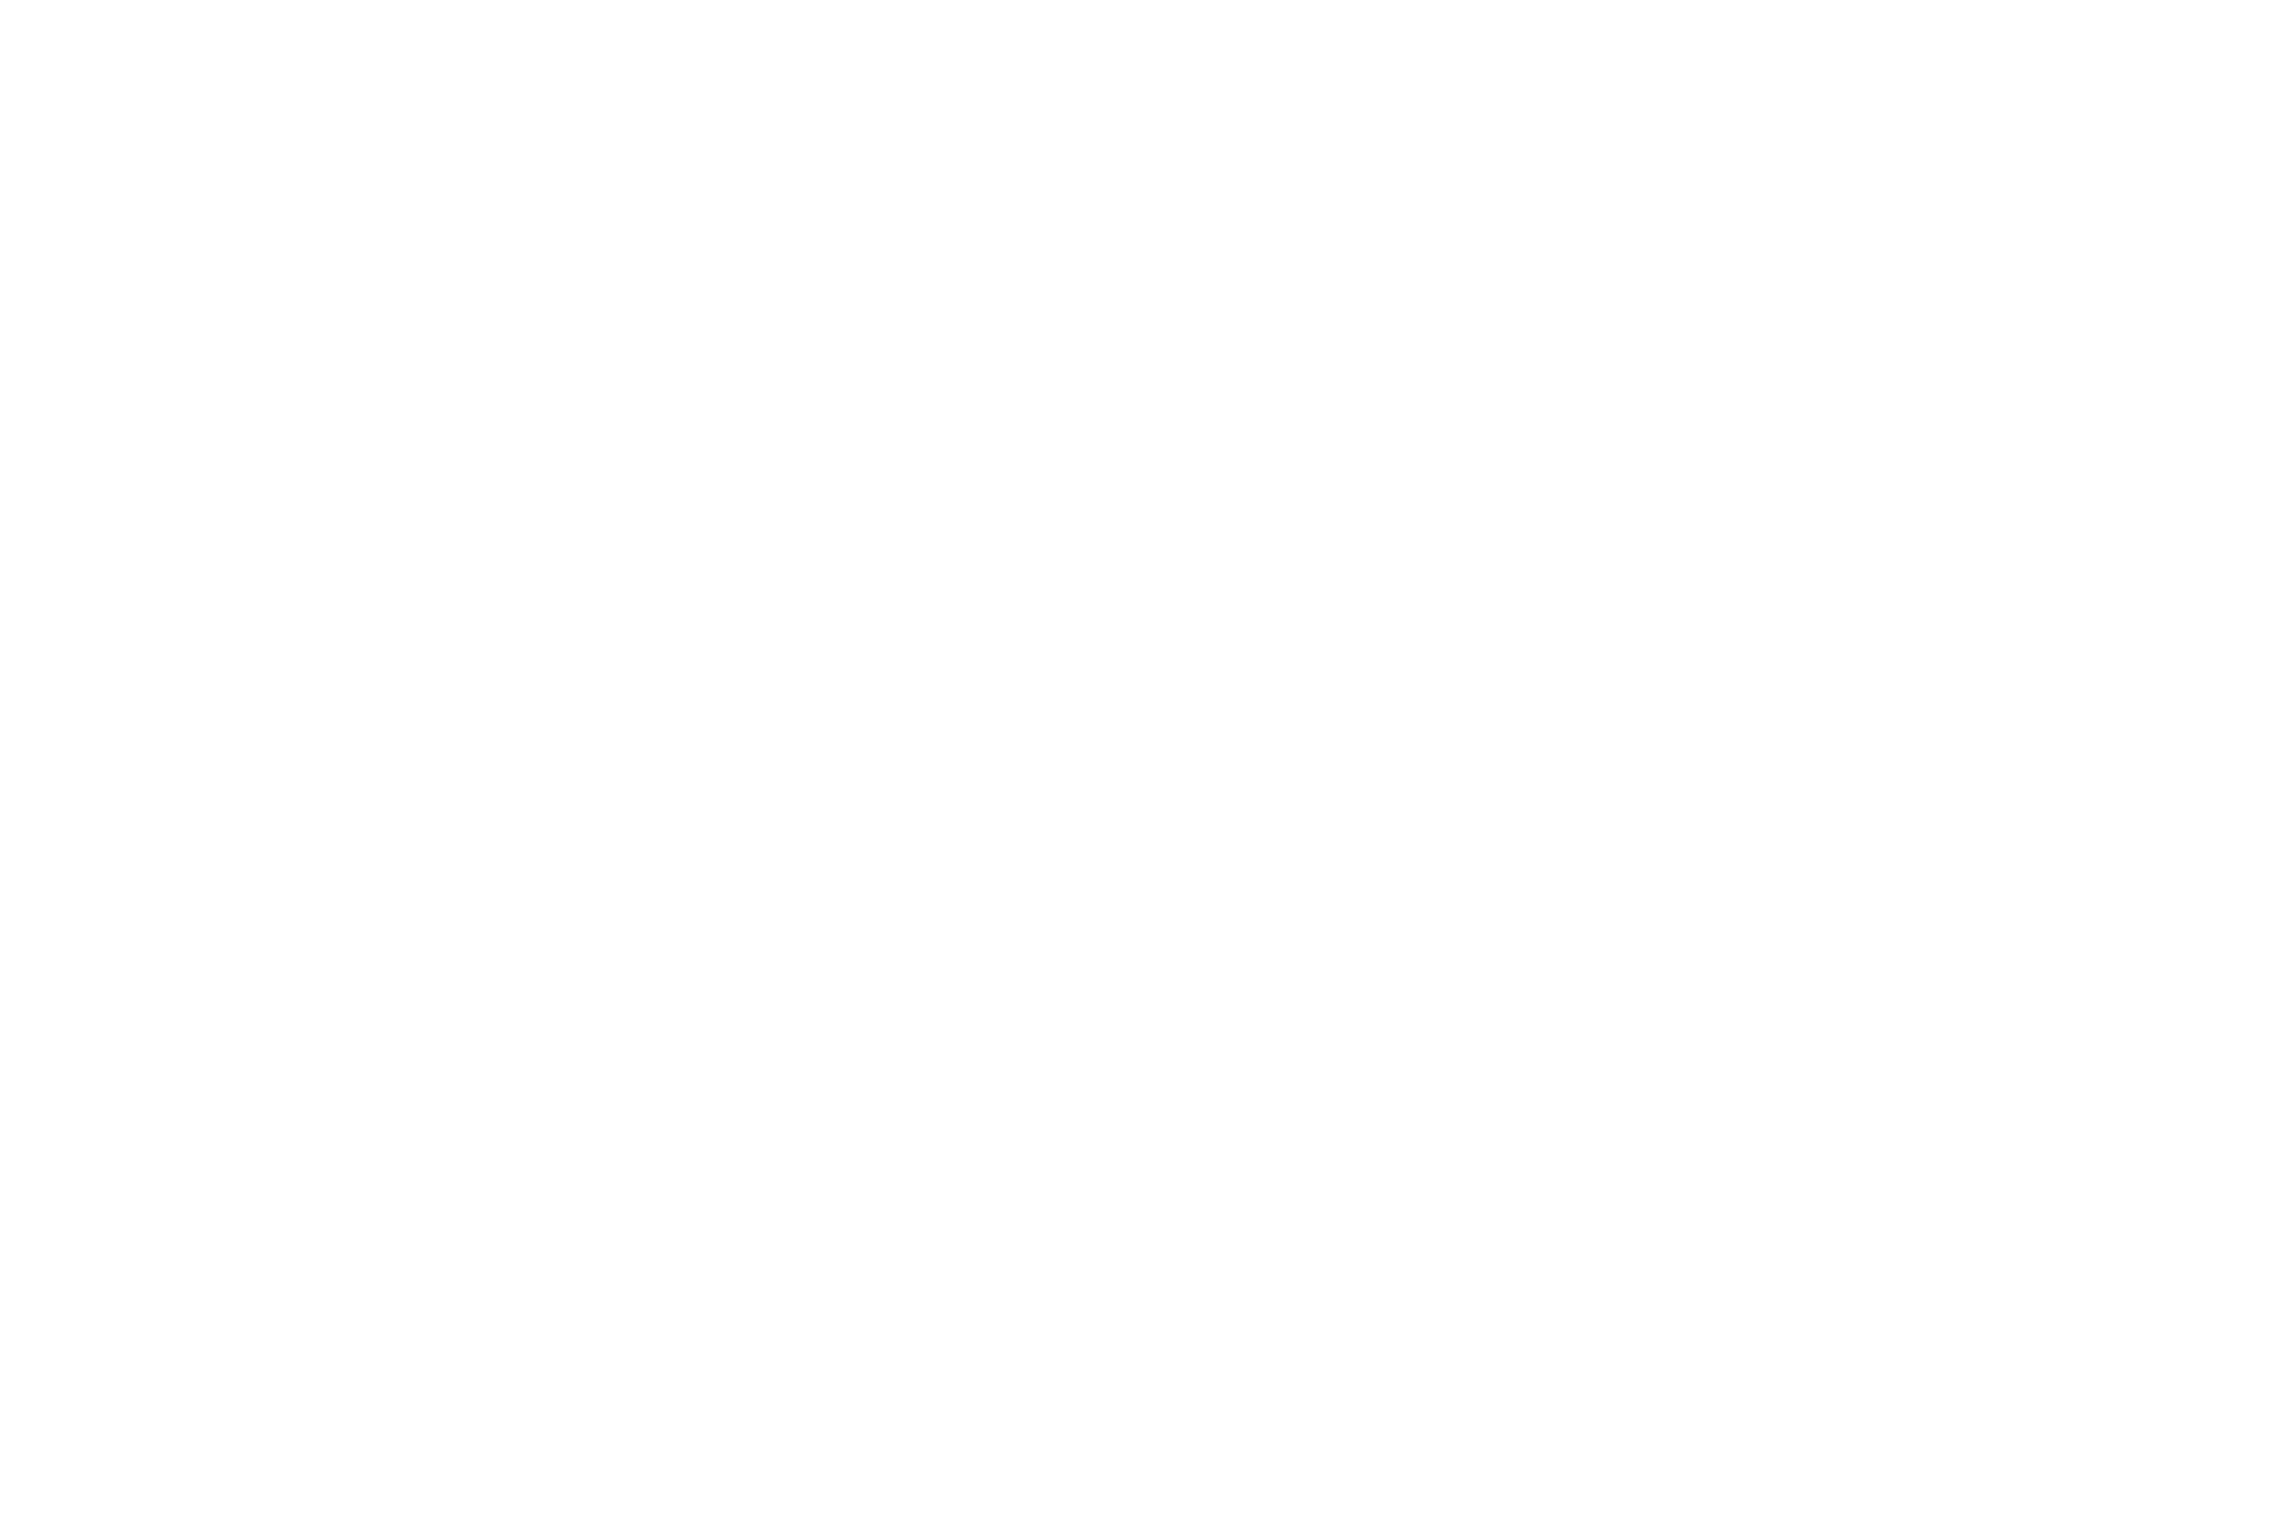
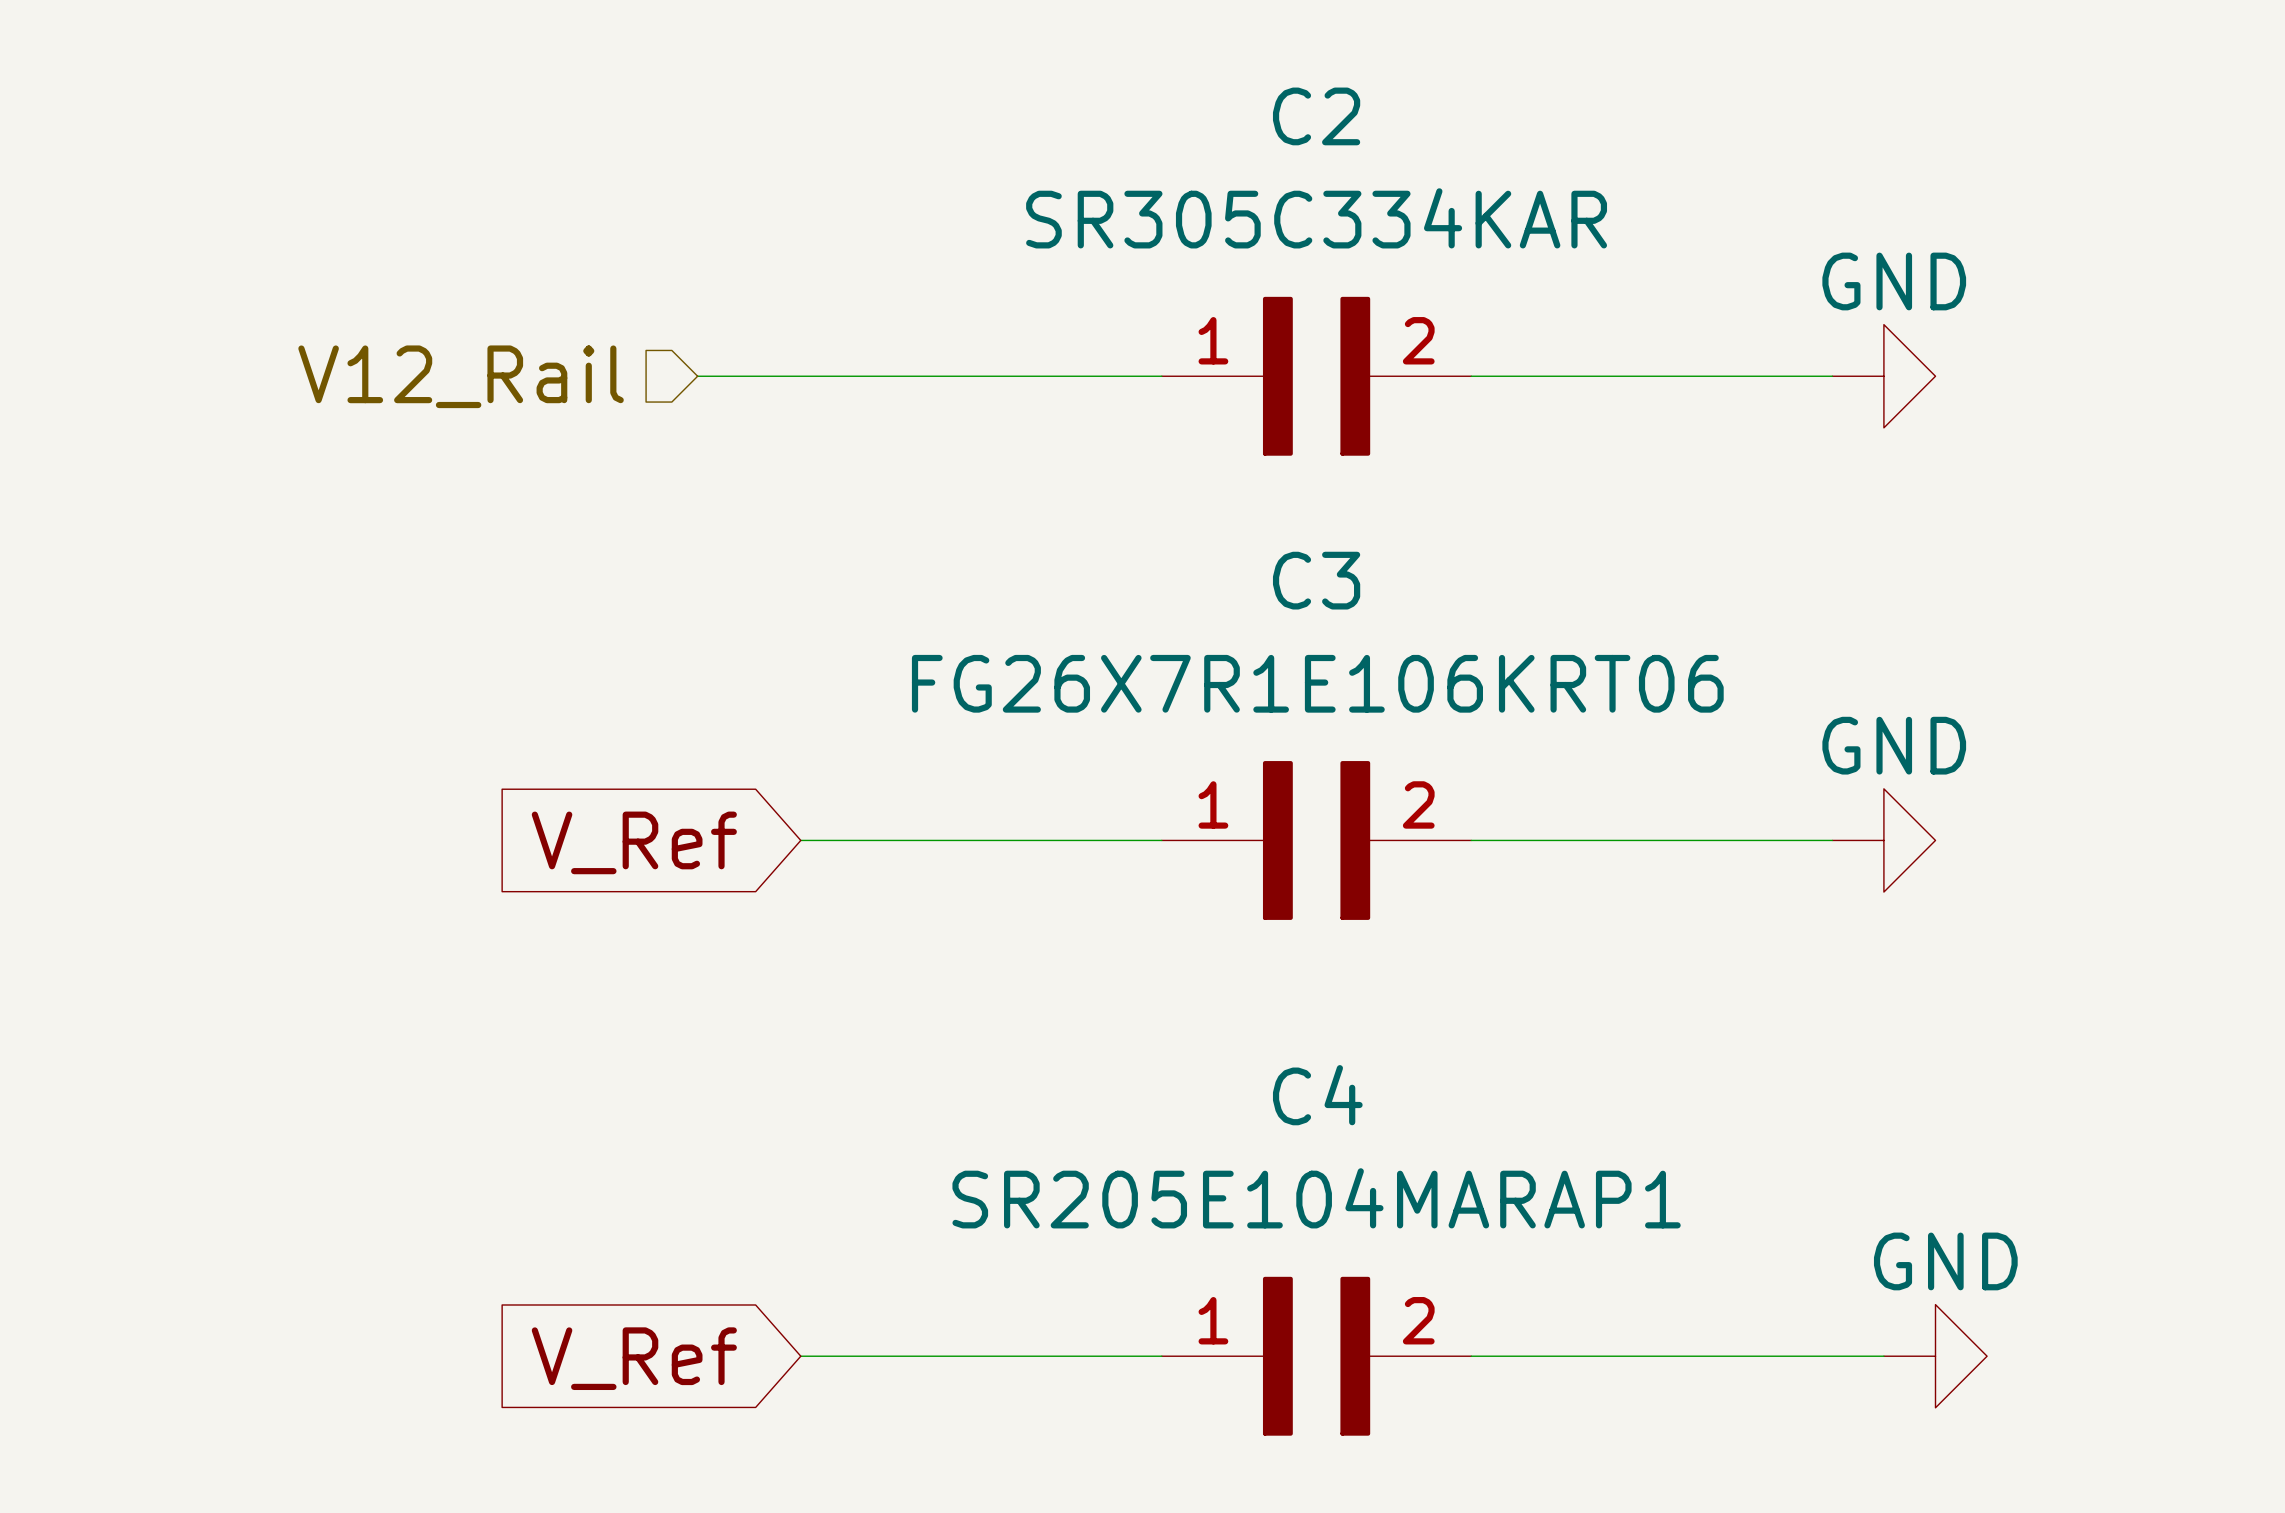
hierarchical label: none -> V12_Rail (461, 376)
wire: none -> (697, 376) (1161, 376)
C2: none -> SR305C334KAR (1316, 376)
wire: none -> (1471, 376) (1832, 376)
power symbol: none -> GND (1883, 376)
wire: none -> (800, 840) (1161, 840)
C3: none -> FG26X7R1E106KRT06 (1316, 840)
wire: none -> (1471, 840) (1832, 840)
power symbol: none -> GND (1883, 840)
global label: none -> V_Ref (634, 842)
wire: none -> (800, 1356) (1161, 1356)
C4: none -> SR205E104MARAP1 (1316, 1356)
wire: none -> (1471, 1356) (1883, 1356)
power symbol: none -> GND (1935, 1356)
global label: none -> V_Ref (634, 1358)

